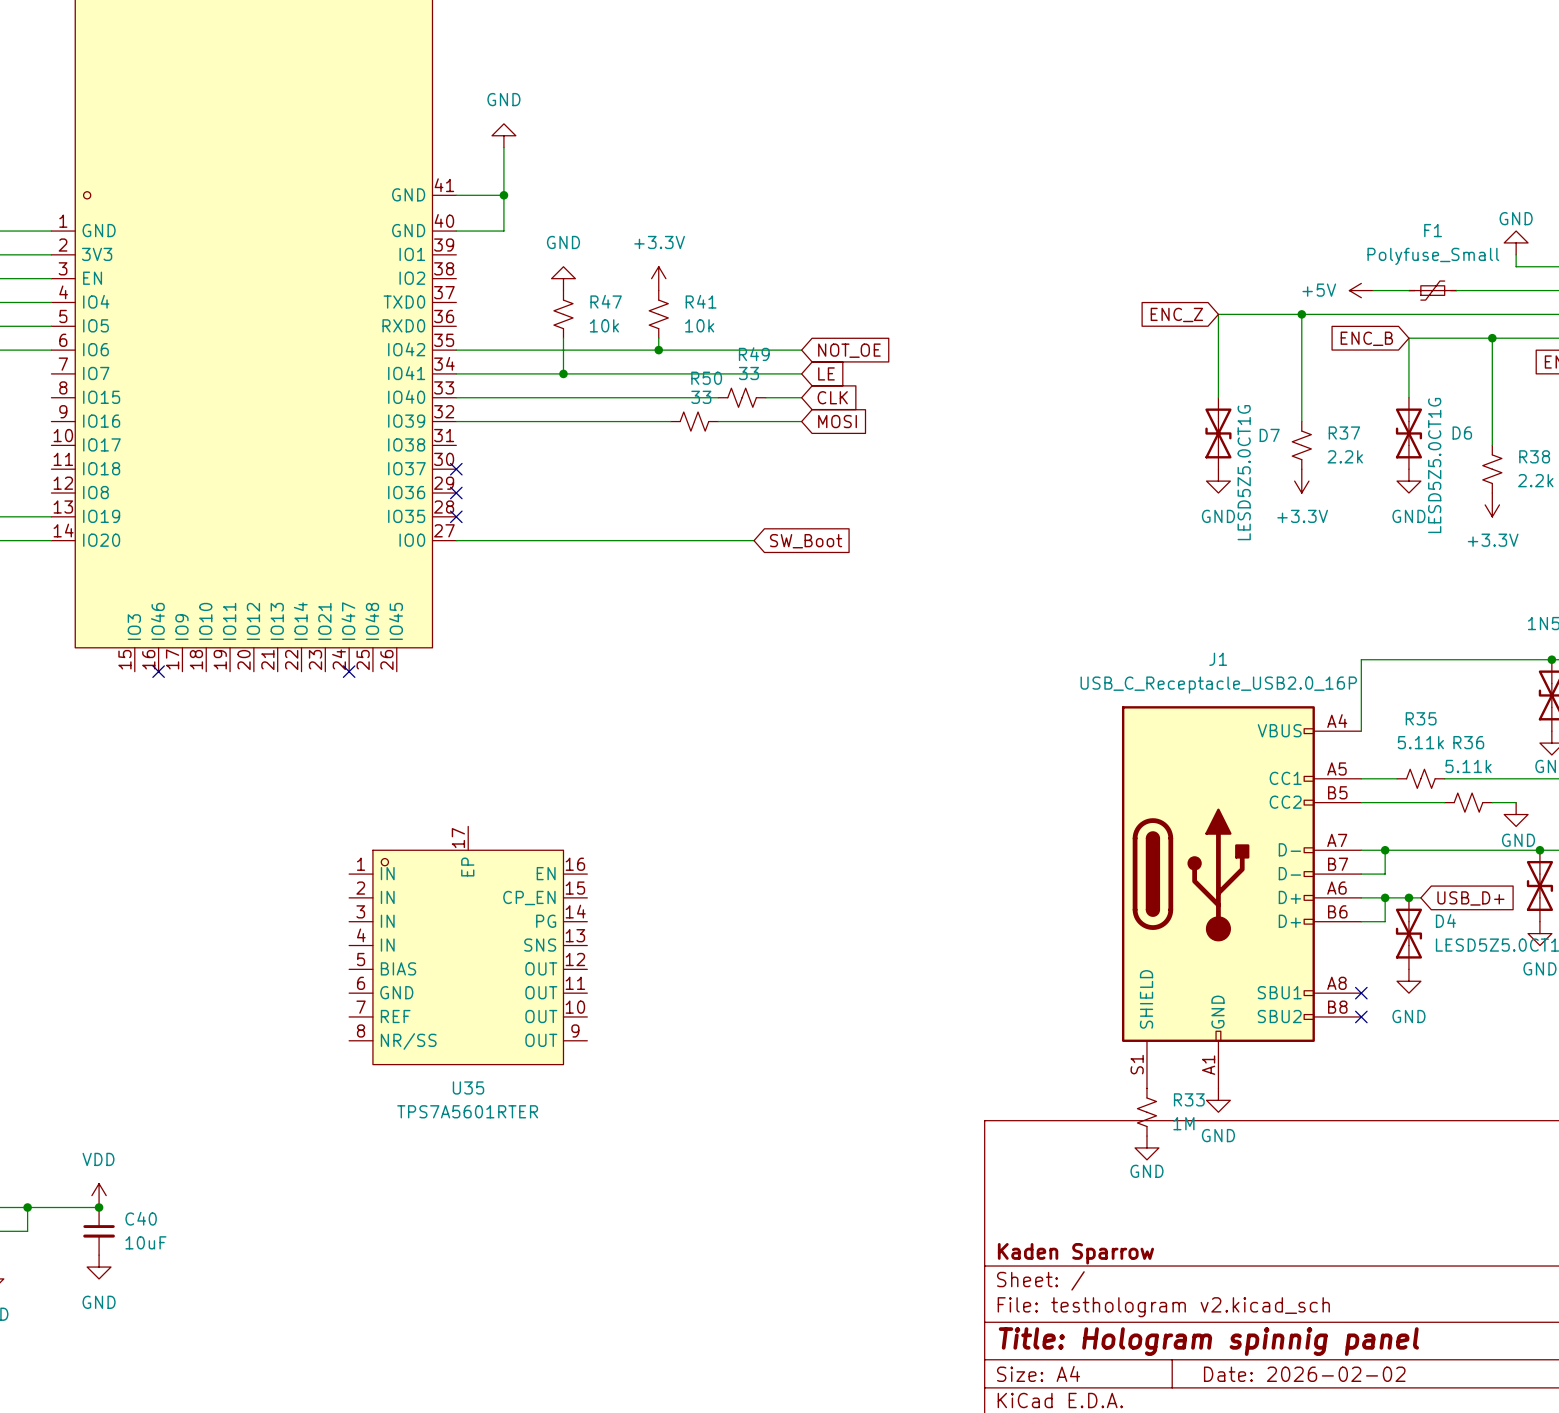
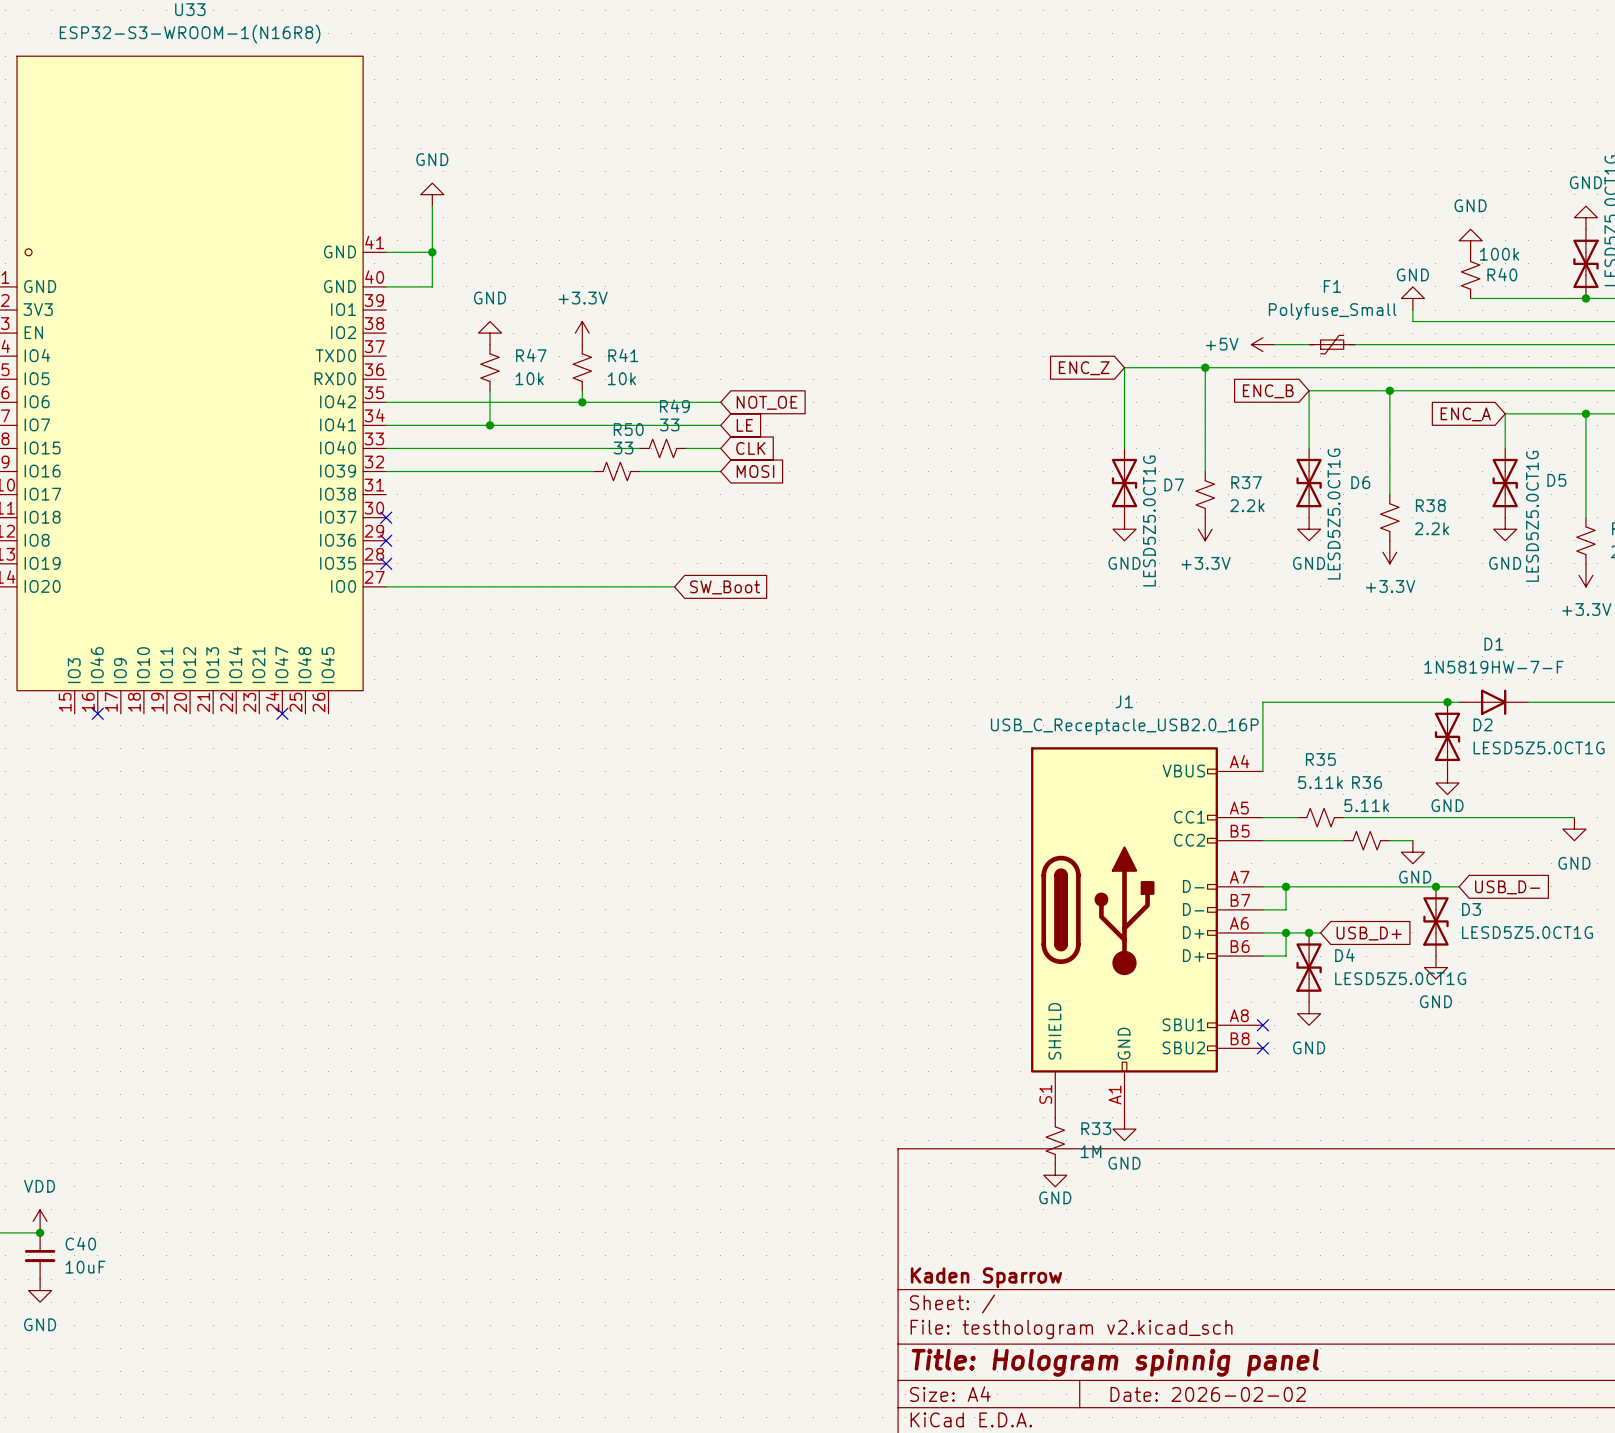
U35: TPS7A5601RTER (468, 945) -> none

